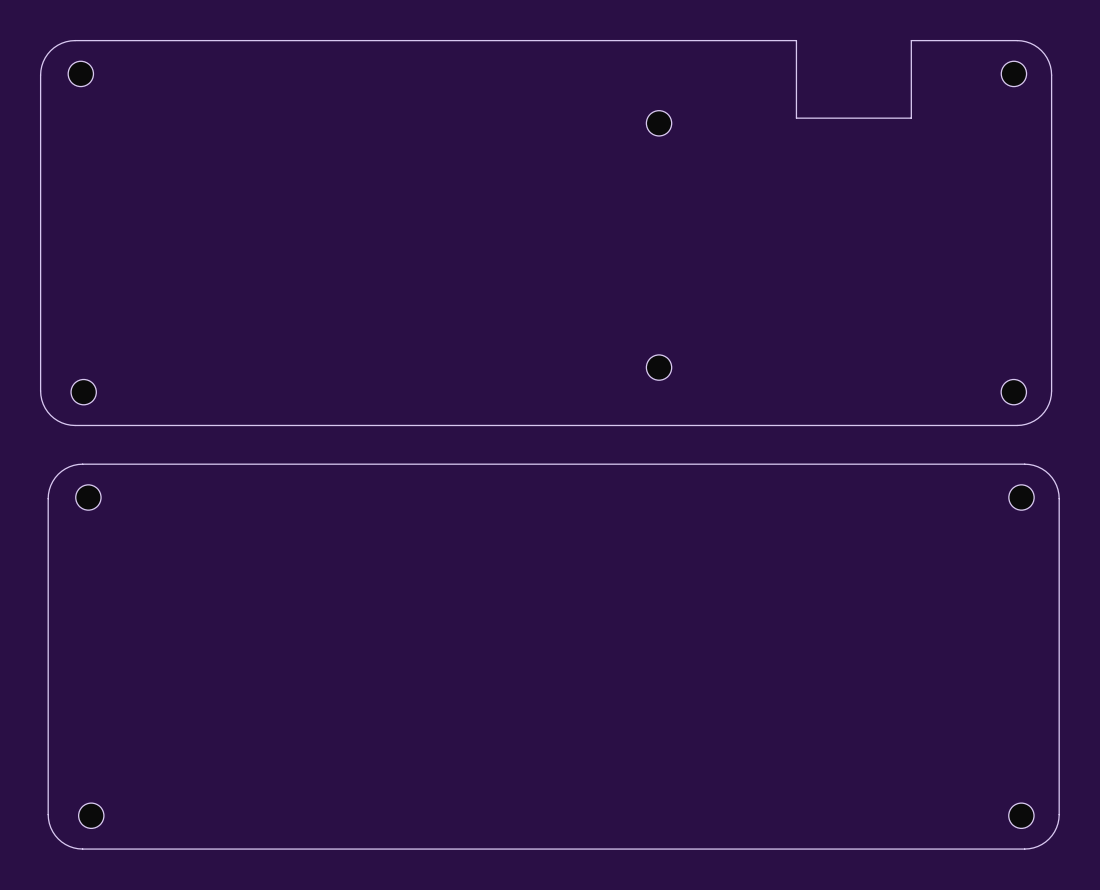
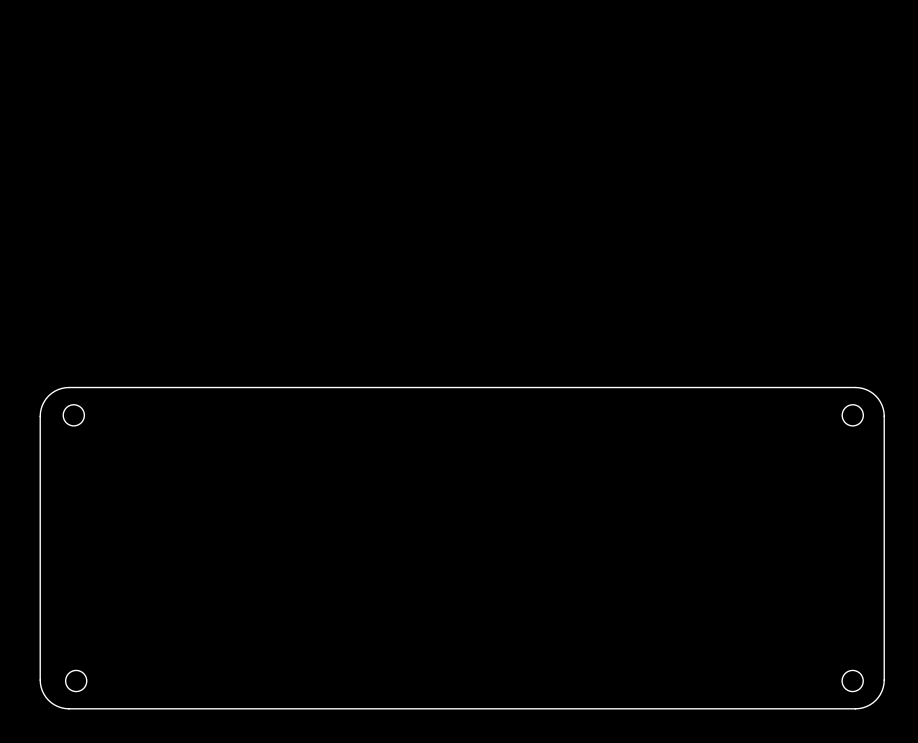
board edge: (1017, 40) (911, 40) (911, 118) (796, 118) (796, 40) (75, 40) (61, 43) (47, 54) (43, 61) (40, 75) (40, 391) (43, 404) (47, 411) (57, 420) (75, 425) (1017, 425) (1030, 422) (1041, 415) (1046, 408) (1051, 391) (1051, 75) (1048, 61) (1041, 50) (1030, 43) (1017, 40) -> none
part: (80, 73) -> none
part: (1013, 73) -> none
part: (659, 123) -> none
part: (659, 367) -> none
part: (83, 392) -> none
part: (1013, 392) -> none

